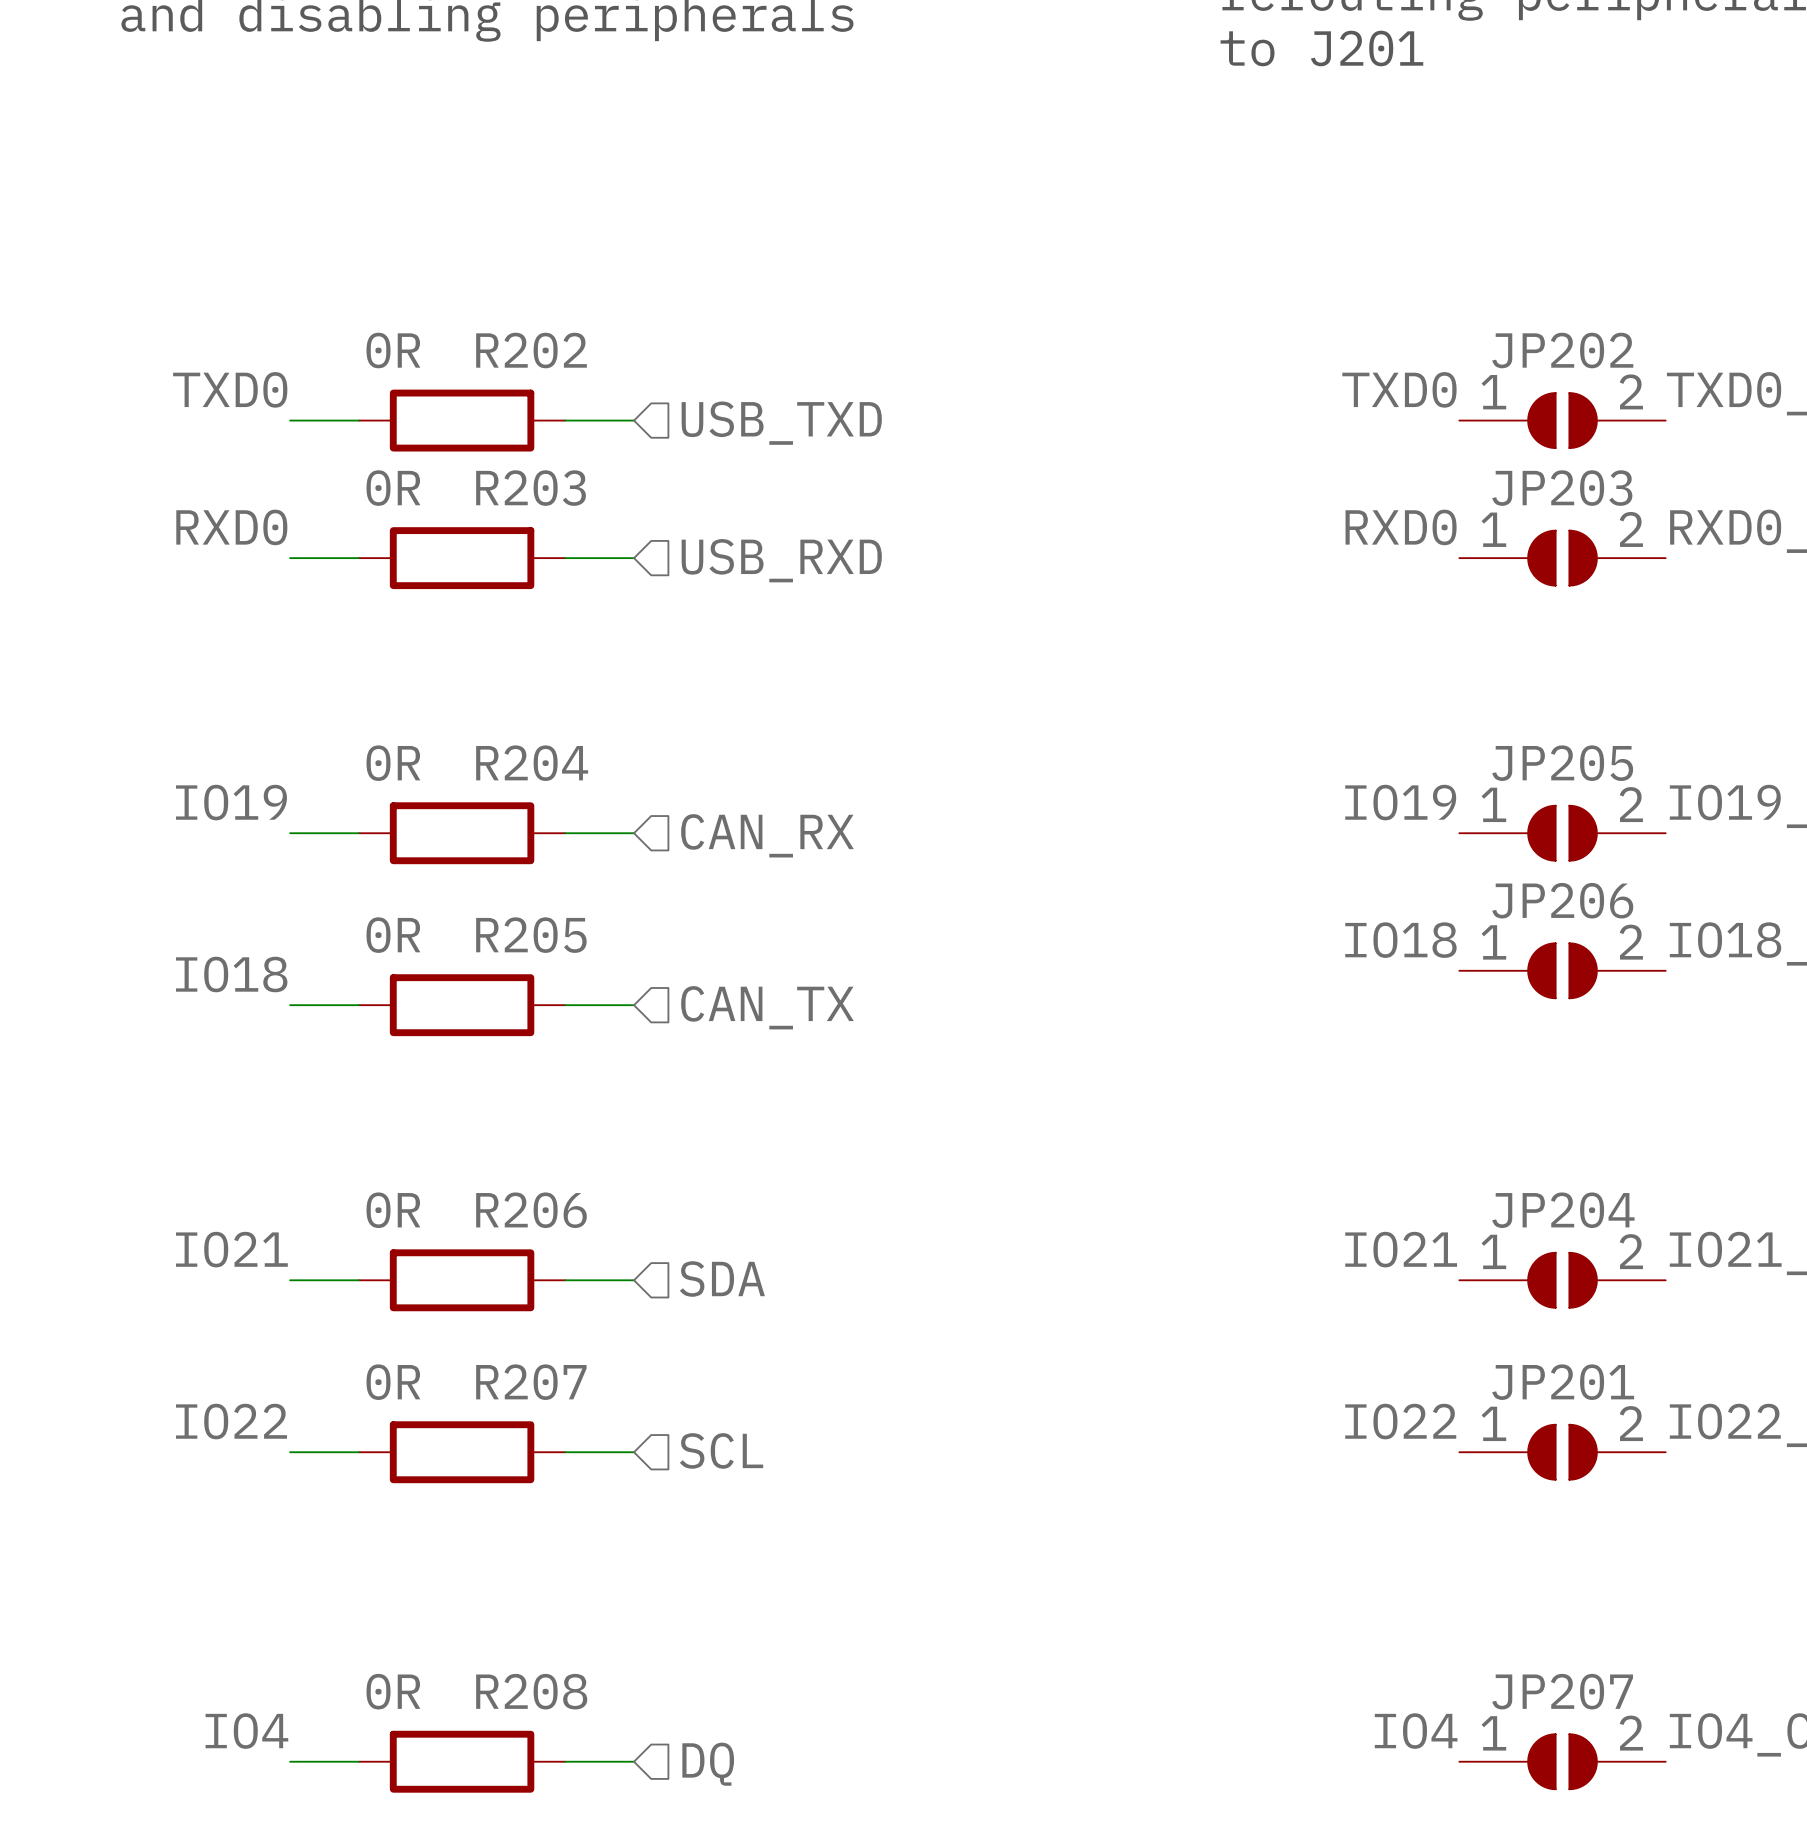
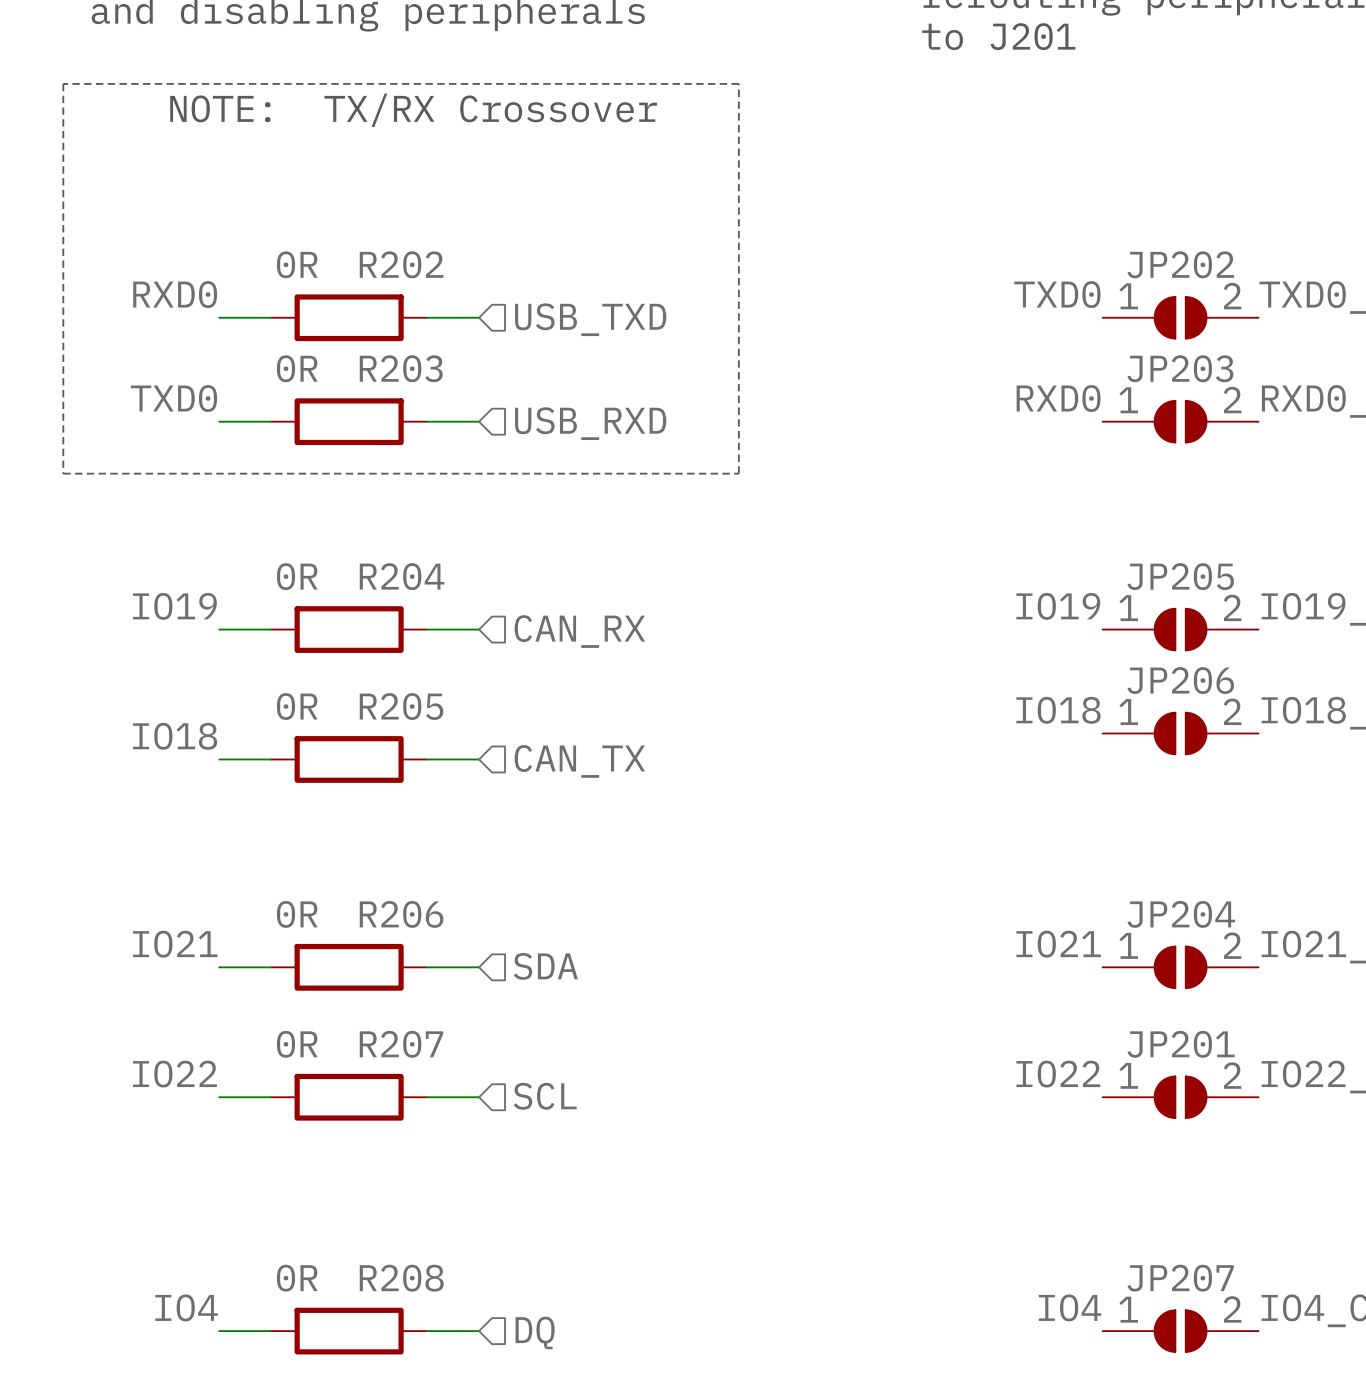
line: none -> (63, 83) (738, 83) (738, 473) (63, 473) (63, 83)
text: none -> NOTE: TX/RX Crossover (413, 110)
label: TXD0 (230, 389) -> RXD0 (175, 294)
label: RXD0 (231, 527) -> TXD0 (173, 398)

